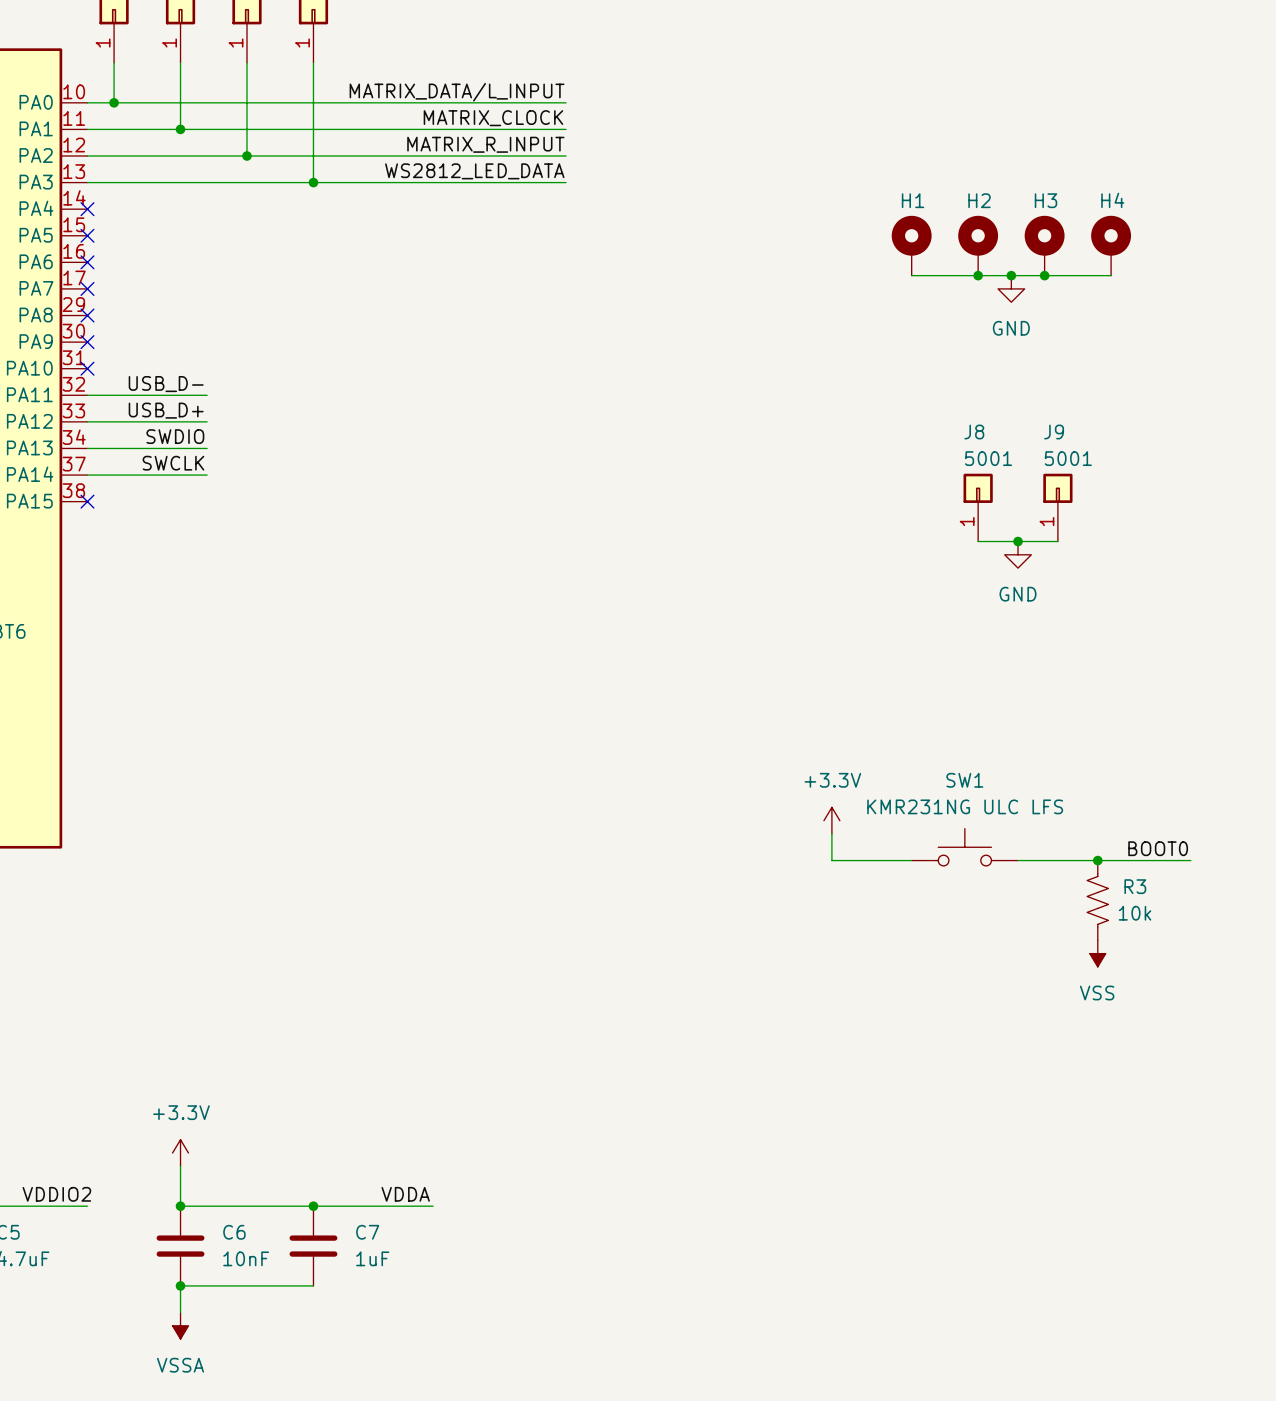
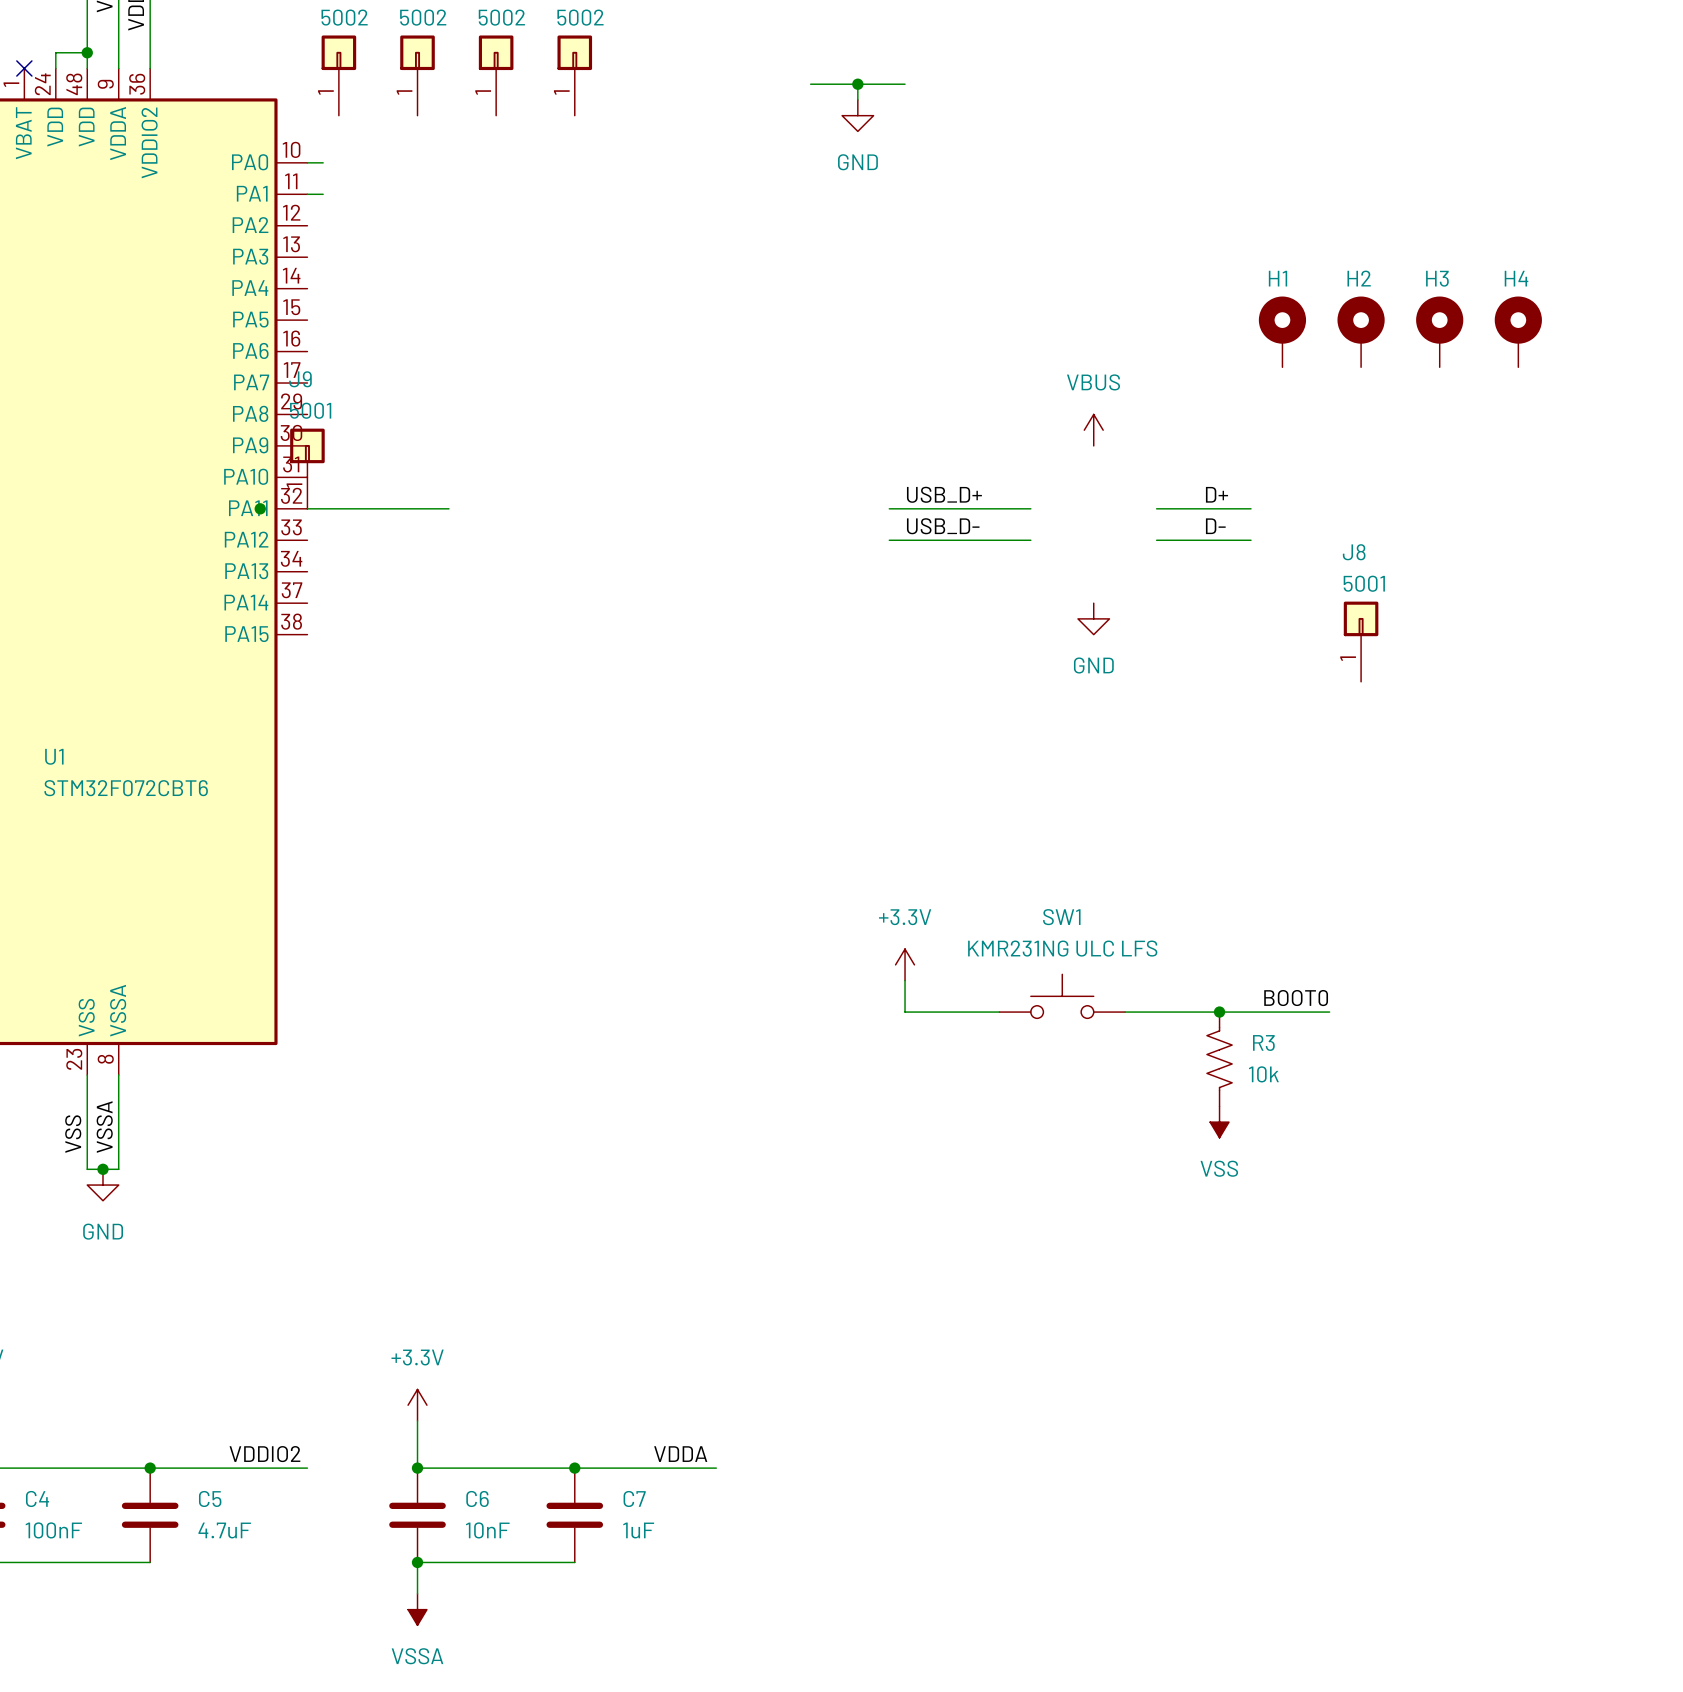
wire: none -> (810, 84) (905, 84)
wire: none -> (857, 84) (857, 99)
junction: none -> (857, 84)
wire: (114, 62) (114, 102) -> none
wire: (180, 62) (180, 129) -> none
wire: (246, 62) (246, 156) -> none
wire: (313, 62) (313, 182) -> none
power symbol: none -> GND (857, 115)
label: MATRIX_DATA/L_INPUT (457, 92) -> none
wire: (100, 102) (566, 102) -> none
junction: (114, 102) -> none
label: MATRIX_CLOCK (493, 118) -> none
wire: (100, 129) (566, 129) -> none
junction: (180, 129) -> none
label: MATRIX_R_INPUT (485, 144) -> none
wire: (87, 156) (566, 156) -> none
junction: (246, 156) -> none
label: WS2812_LED_DATA (474, 171) -> none
wire: (87, 182) (566, 182) -> none
junction: (313, 182) -> none
no-connect mark: (87, 209) -> none
no-connect mark: (87, 235) -> none
no-connect mark: (87, 262) -> none
wire: (911, 275) (1111, 275) -> none
junction: (978, 275) -> none
junction: (1011, 275) -> none
junction: (1044, 275) -> none
no-connect mark: (87, 288) -> none
power symbol: GND (1011, 288) -> none
no-connect mark: (87, 315) -> none
power symbol: none -> VBUS (1093, 430)
no-connect mark: (87, 342) -> none
no-connect mark: (87, 368) -> none
label: none -> D+ (1216, 494)
label: USB_D- (166, 384) -> none
label: none -> USB_D+ (944, 494)
junction: none -> (260, 508)
wire: none -> (889, 508) (1030, 508)
wire: none -> (1156, 508) (1250, 508)
label: USB_D+ (166, 410) -> none
label: none -> USB_D- (943, 526)
label: none -> D- (1215, 526)
wire: (87, 421) (207, 421) -> none
wire: none -> (889, 540) (1030, 540)
label: SWDIO (175, 436) -> none
wire: (87, 448) (207, 448) -> none
label: SWCLK (173, 463) -> none
wire: (87, 475) (207, 475) -> none
power symbol: none -> GND (1093, 618)
no-connect mark: (87, 501) -> none
J9 position: (1057, 507) -> (307, 468)
wire: (978, 541) (1057, 541) -> (1156, 540) (1250, 540)
junction: (1018, 541) -> none
power symbol: GND (1018, 554) -> none
power symbol position: +3.3V (831, 820) -> +3.3V (905, 964)
junction: none -> (1219, 1012)
wire: (831, 833) (831, 860) (911, 860) -> (905, 980) (905, 1012) (999, 1012)
SW1 position: (964, 847) -> (1062, 996)
label position: BOOT0 (1158, 848) -> BOOT0 (1296, 998)
wire: (1018, 860) (1190, 860) -> (1125, 1012) (1329, 1012)
junction: (1097, 860) -> none
R3 position: (1097, 900) -> (1219, 1059)
power symbol position: VSS (1097, 953) -> VSS (1219, 1122)

